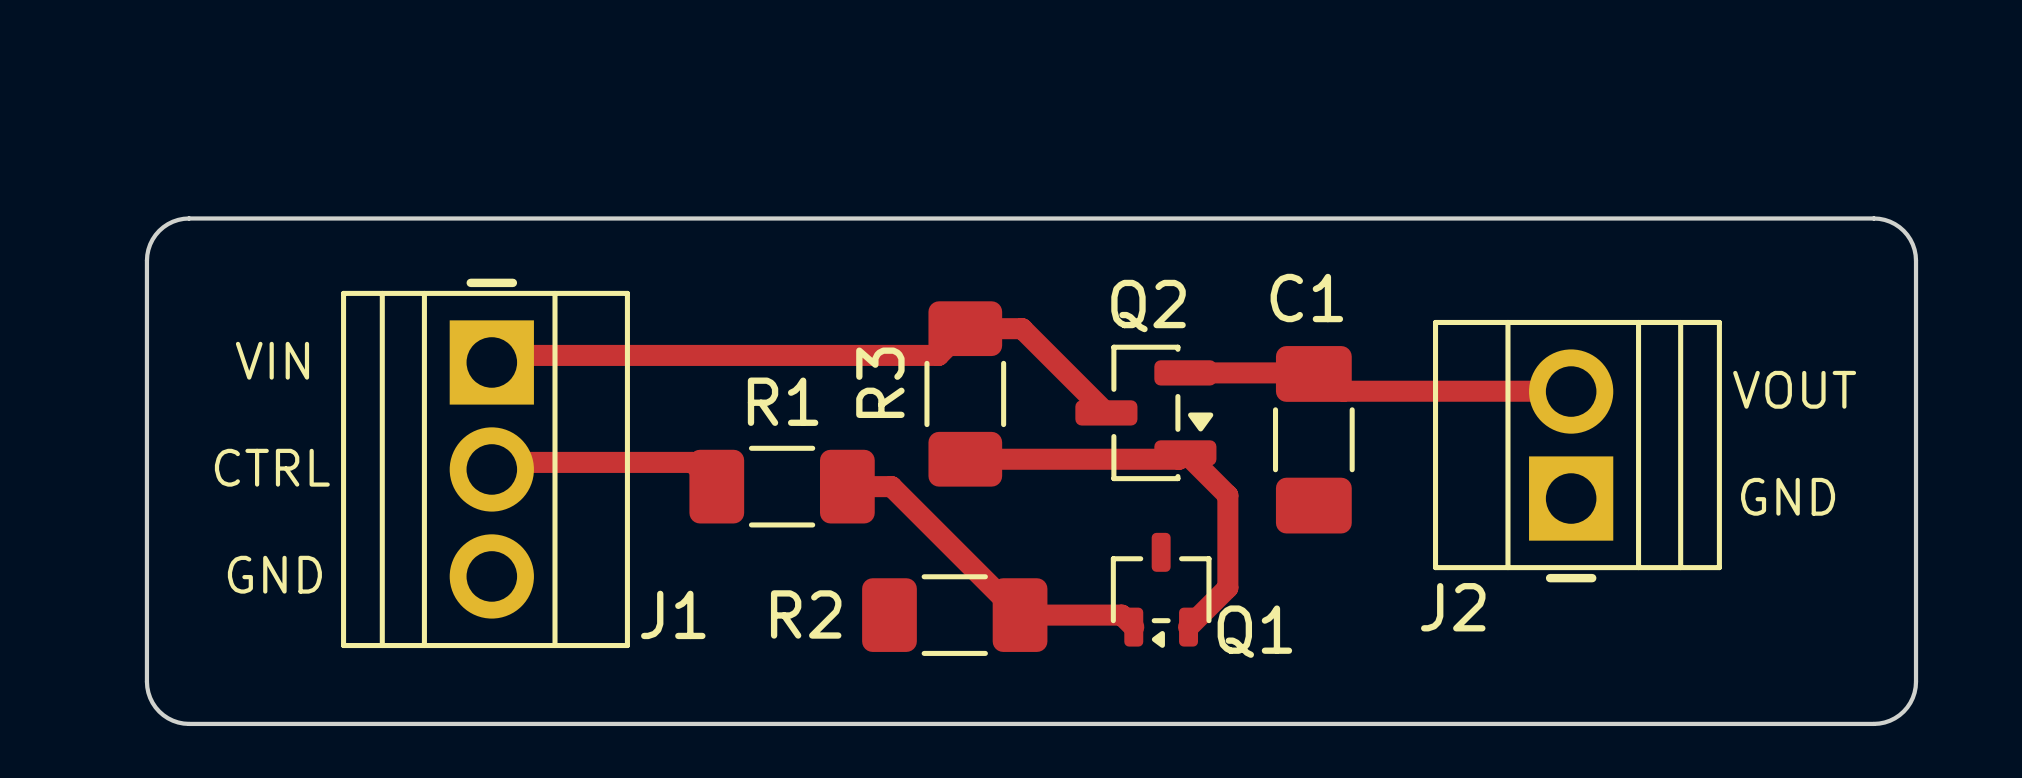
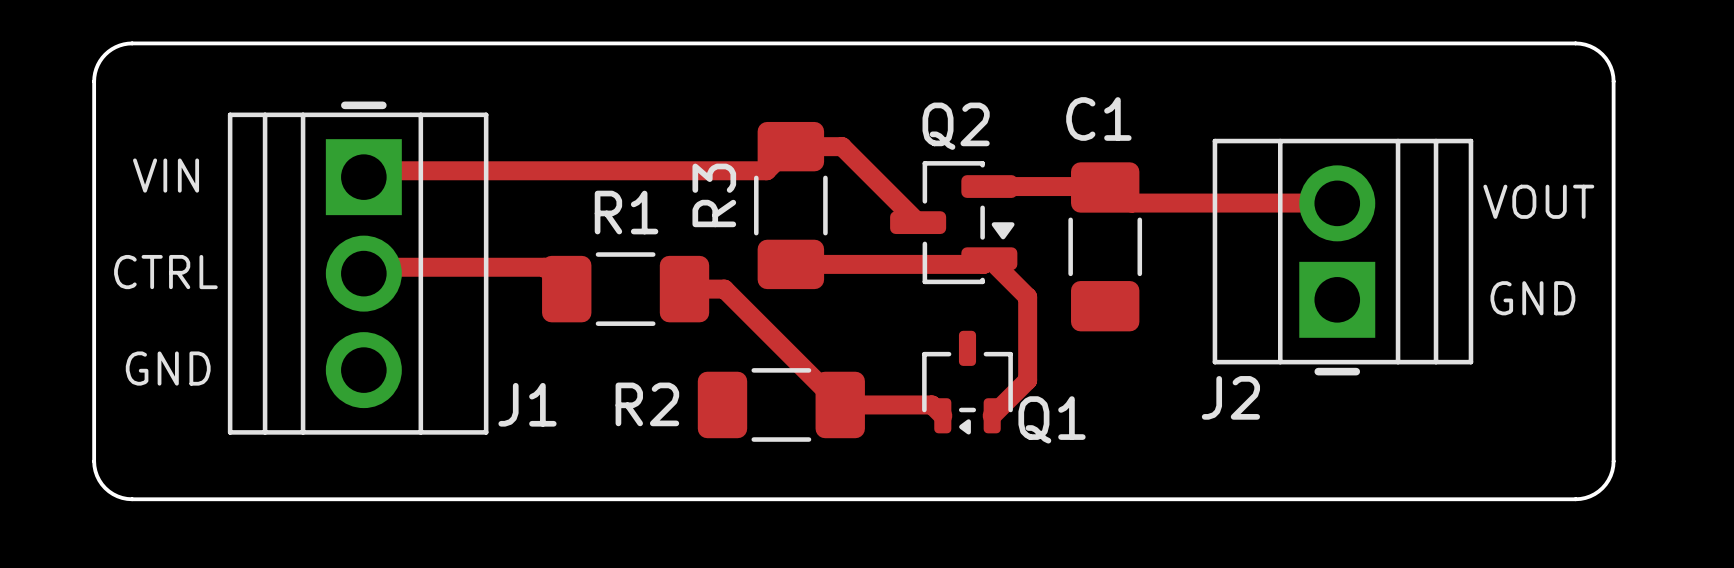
board edge: (189, 218) (1884, 219) (1899, 227) (1907, 234) (1912, 244) (1916, 260) (1914, 692) (1907, 707) (1899, 715) (1884, 722) (1873, 723) (178, 722) (159, 711) (150, 697) (147, 687) (146, 260) (150, 244) (159, 230) (172, 221) (189, 218) -> (132, 43) (119, 45) (105, 54) (96, 68) (94, 81) (94, 466) (101, 484) (113, 494) (122, 497) (1575, 499) (1585, 497) (1598, 491) (1605, 484) (1612, 471) (1613, 81) (1610, 66) (1605, 58) (1594, 48) (1585, 44) (132, 43)

